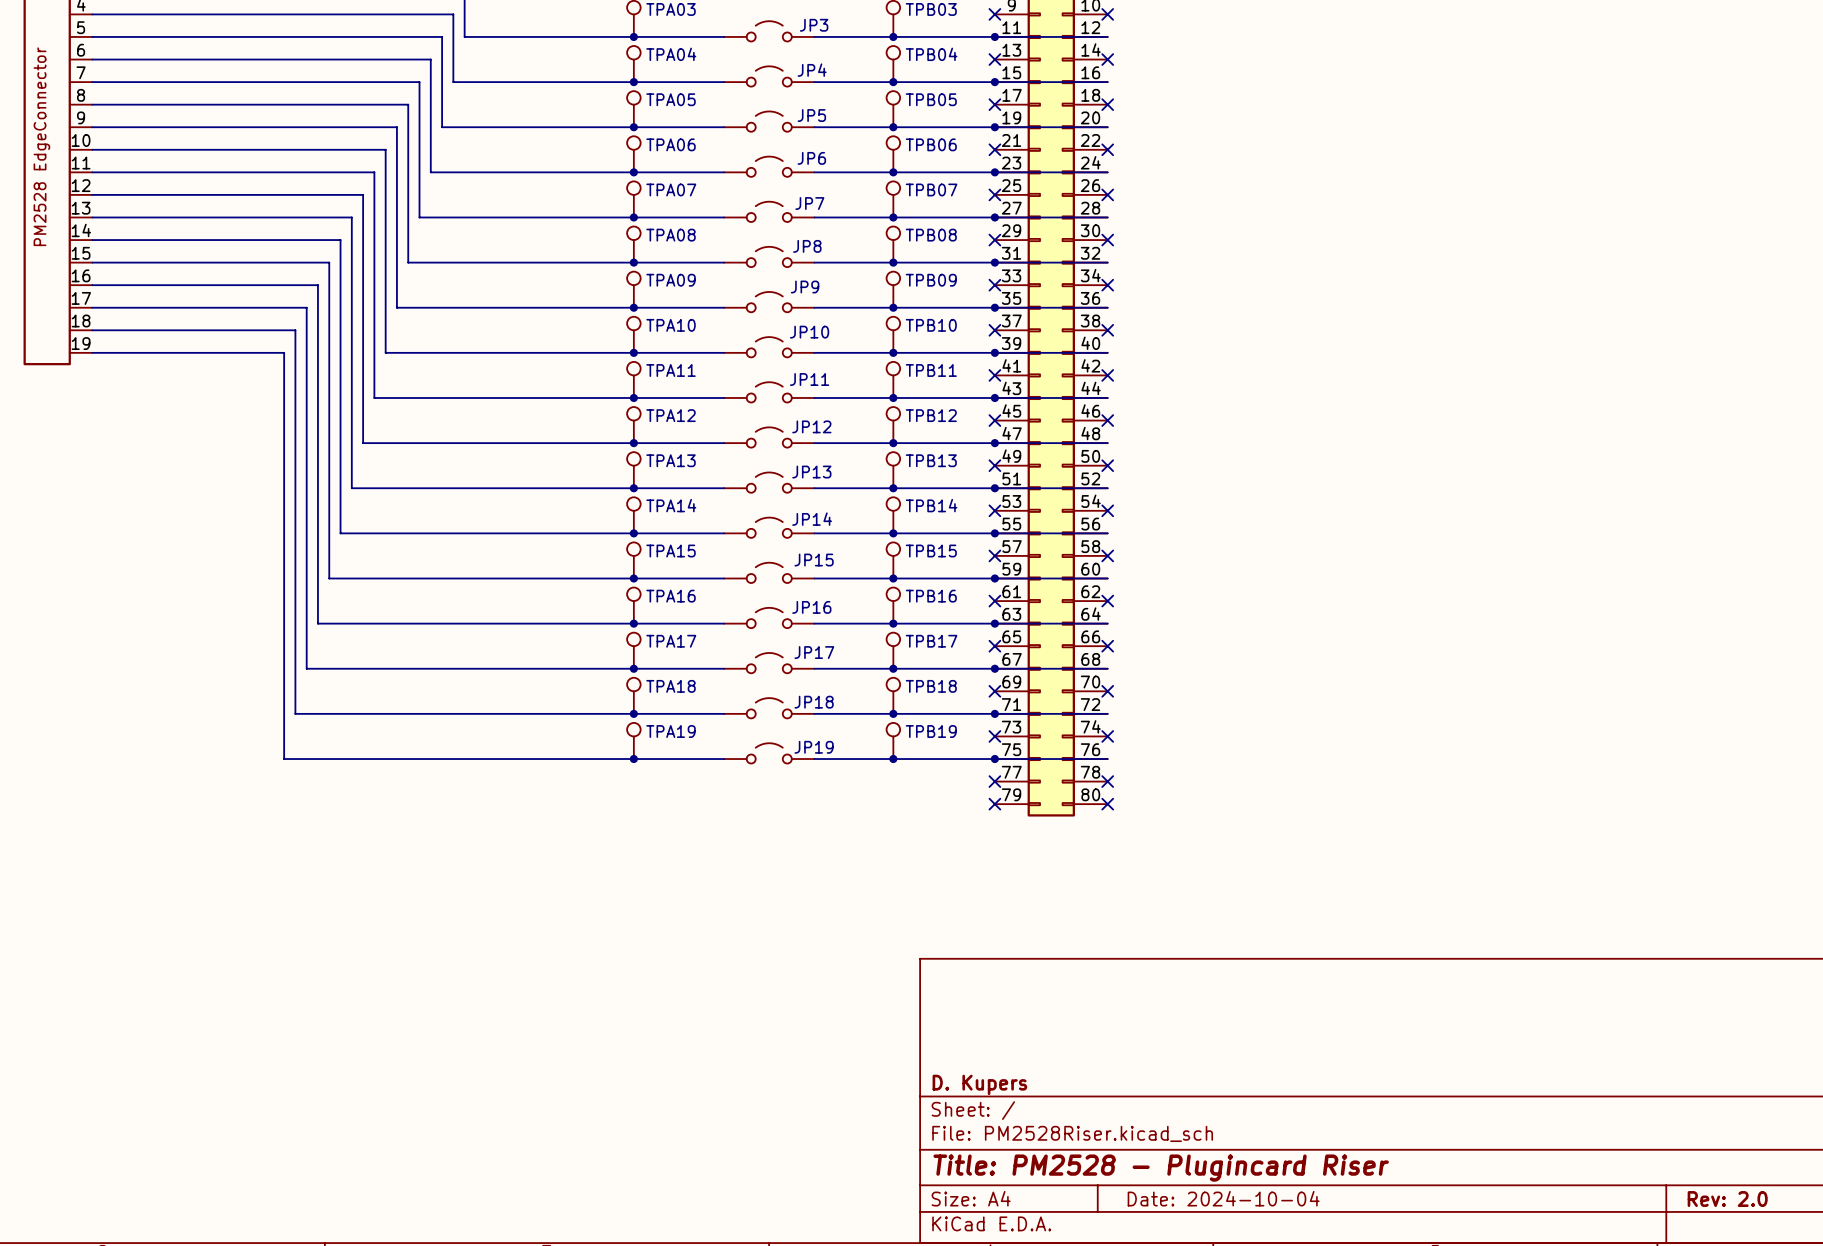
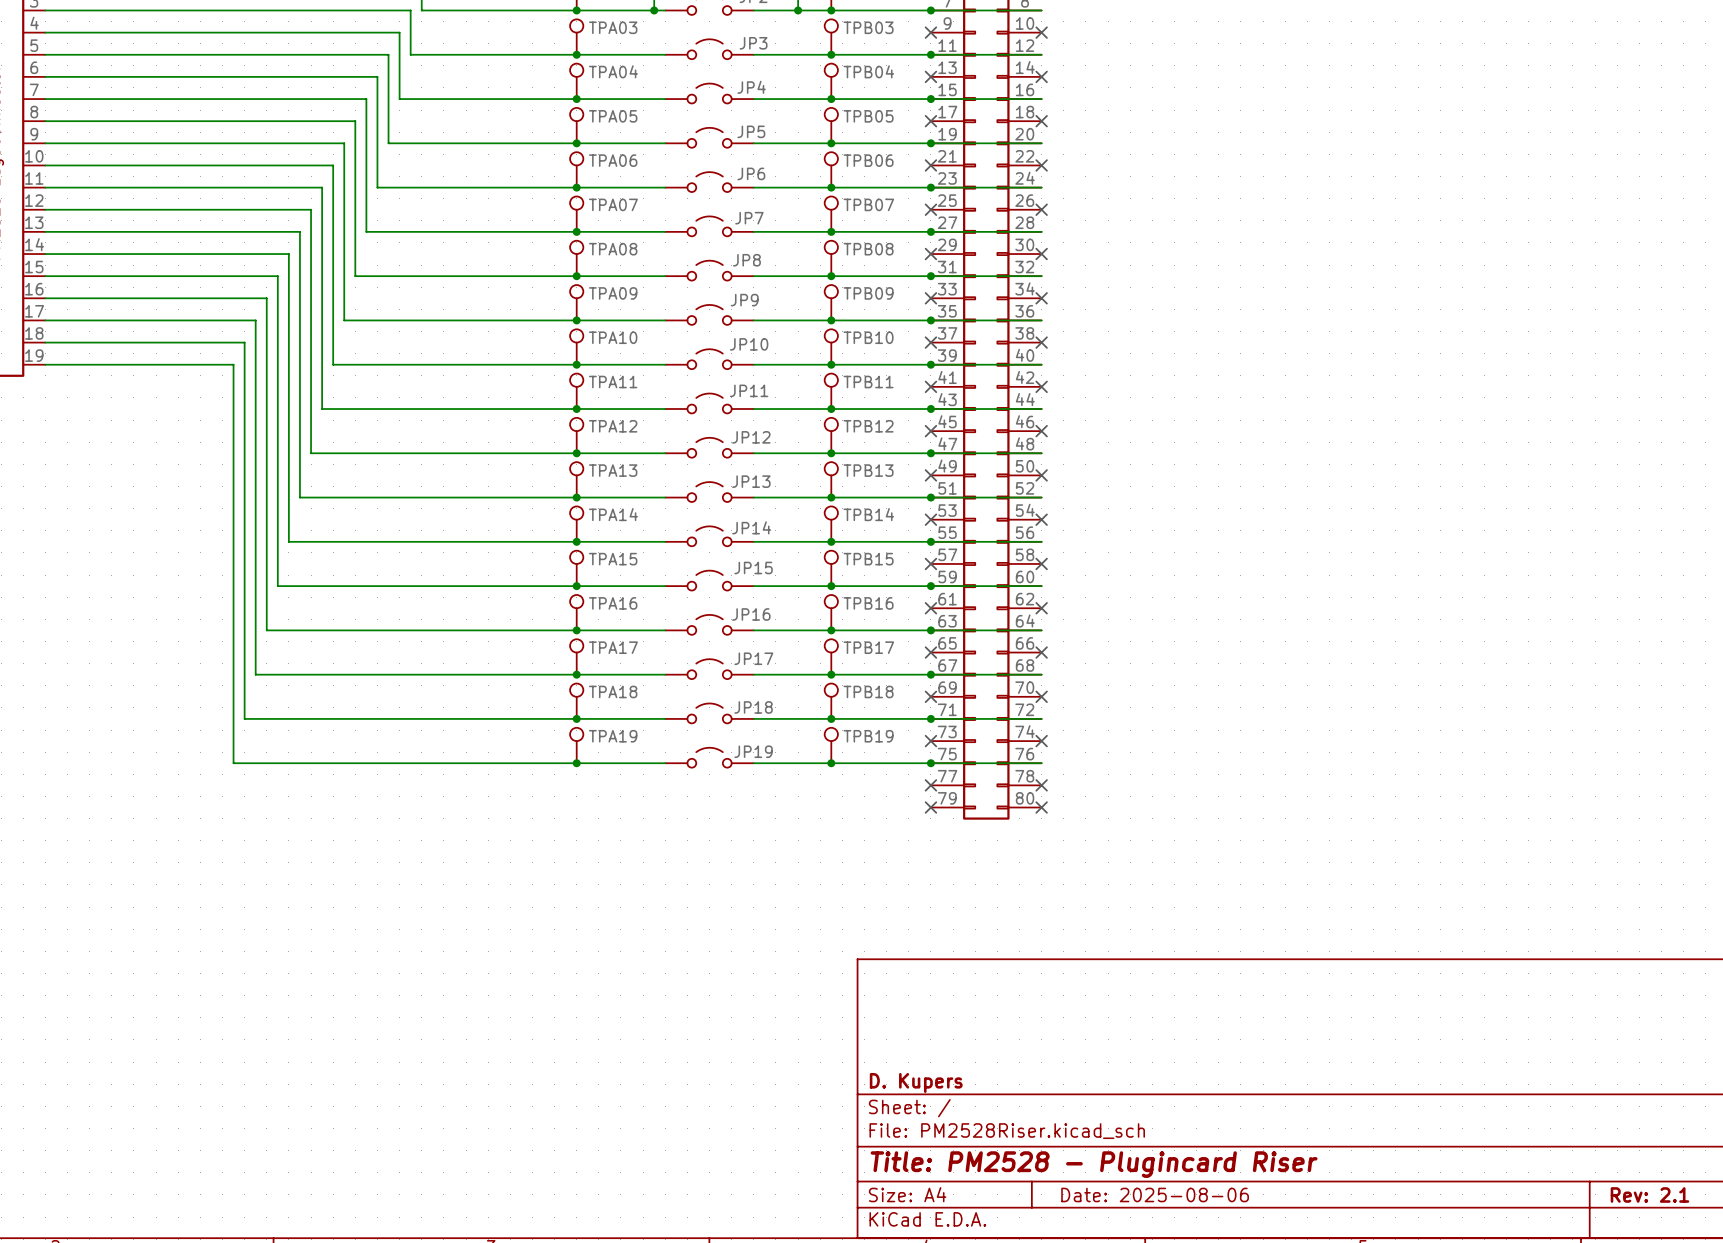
title block: Date: 2024-10-04 (1223, 1198) -> Date: 2025-08-06 (1155, 1194)
title block: Rev: 2.0 (1727, 1199) -> Rev: 2.1 (1649, 1194)

